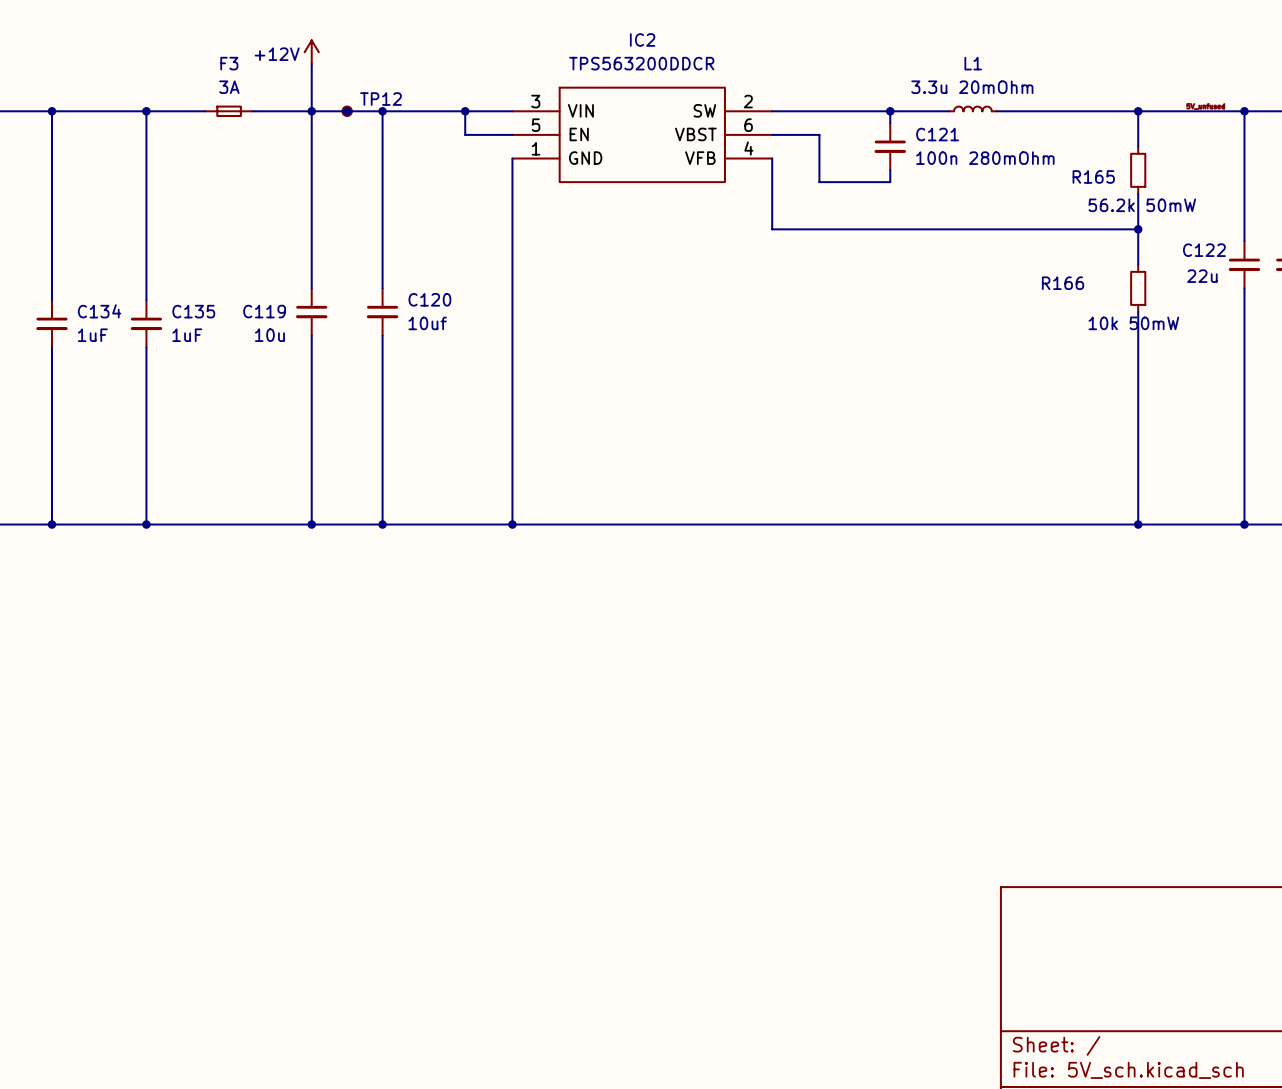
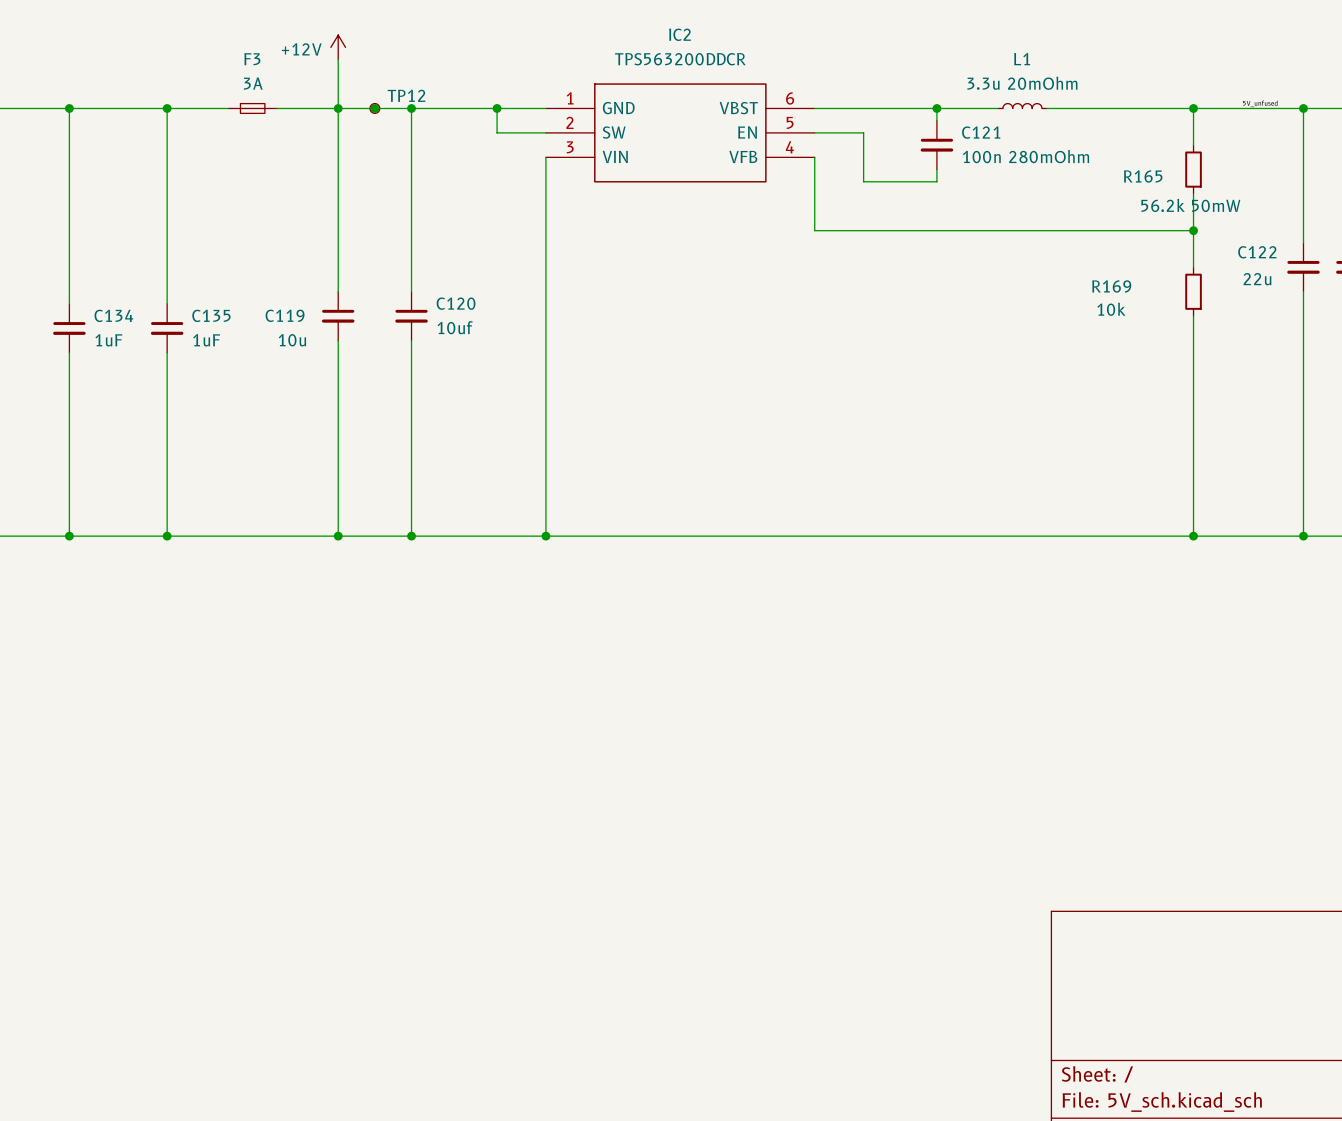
IC2 symbol: [512, 86, 773, 183] -> [545, 83, 815, 183]
R166 name: R166 (1063, 283) -> R169 (1111, 286)
R166 value: 10k 50mW (1133, 323) -> 10k (1111, 309)

